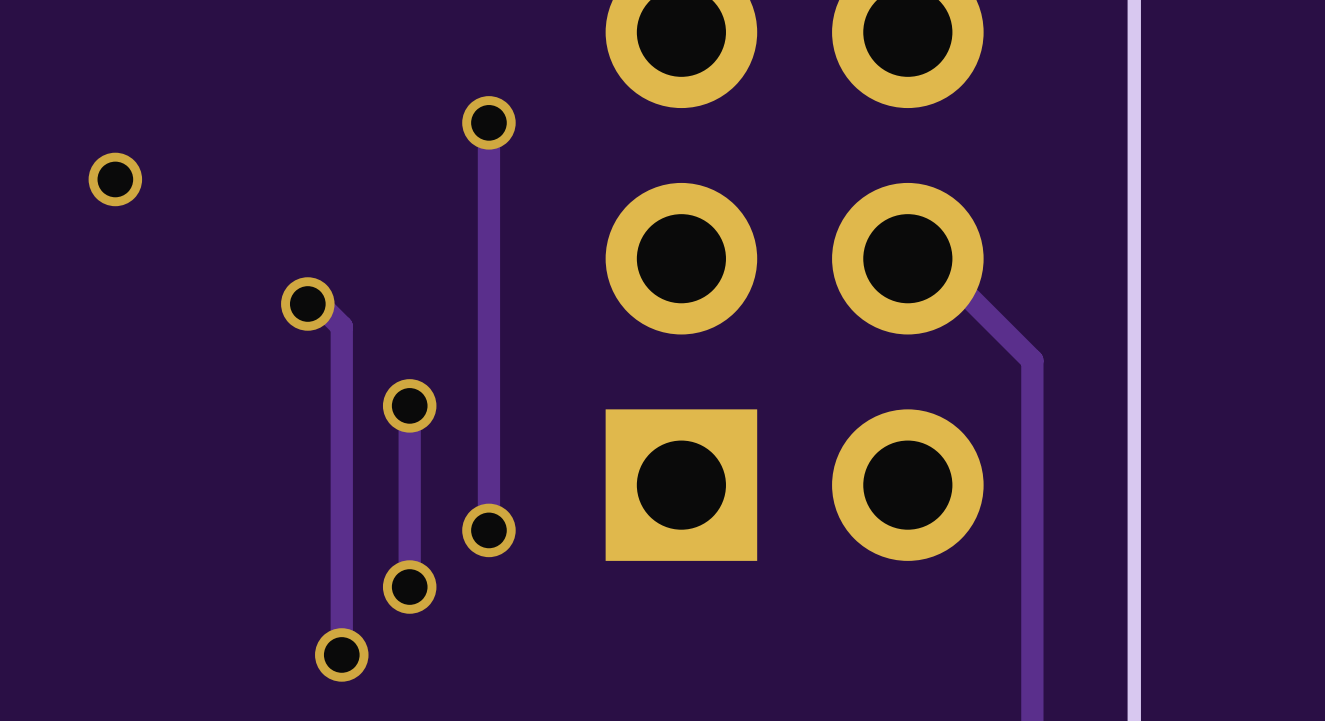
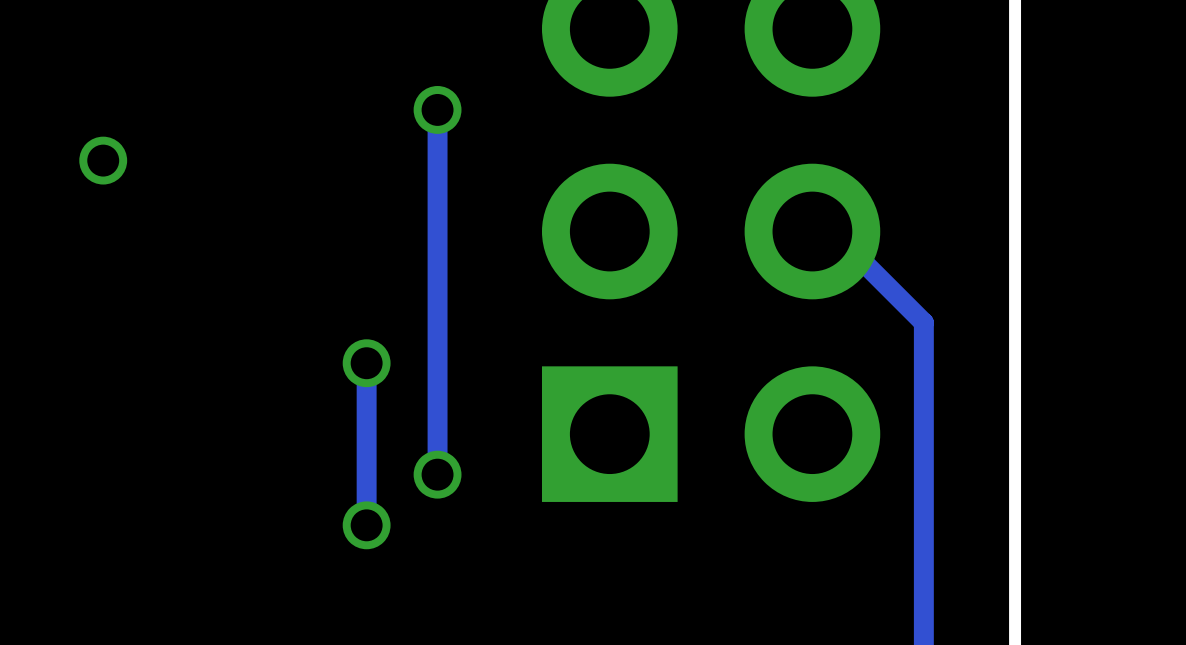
track: (307, 303) (319, 303) (341, 326) (341, 654) -> none
via: (307, 303) -> none
via: (341, 654) -> none

